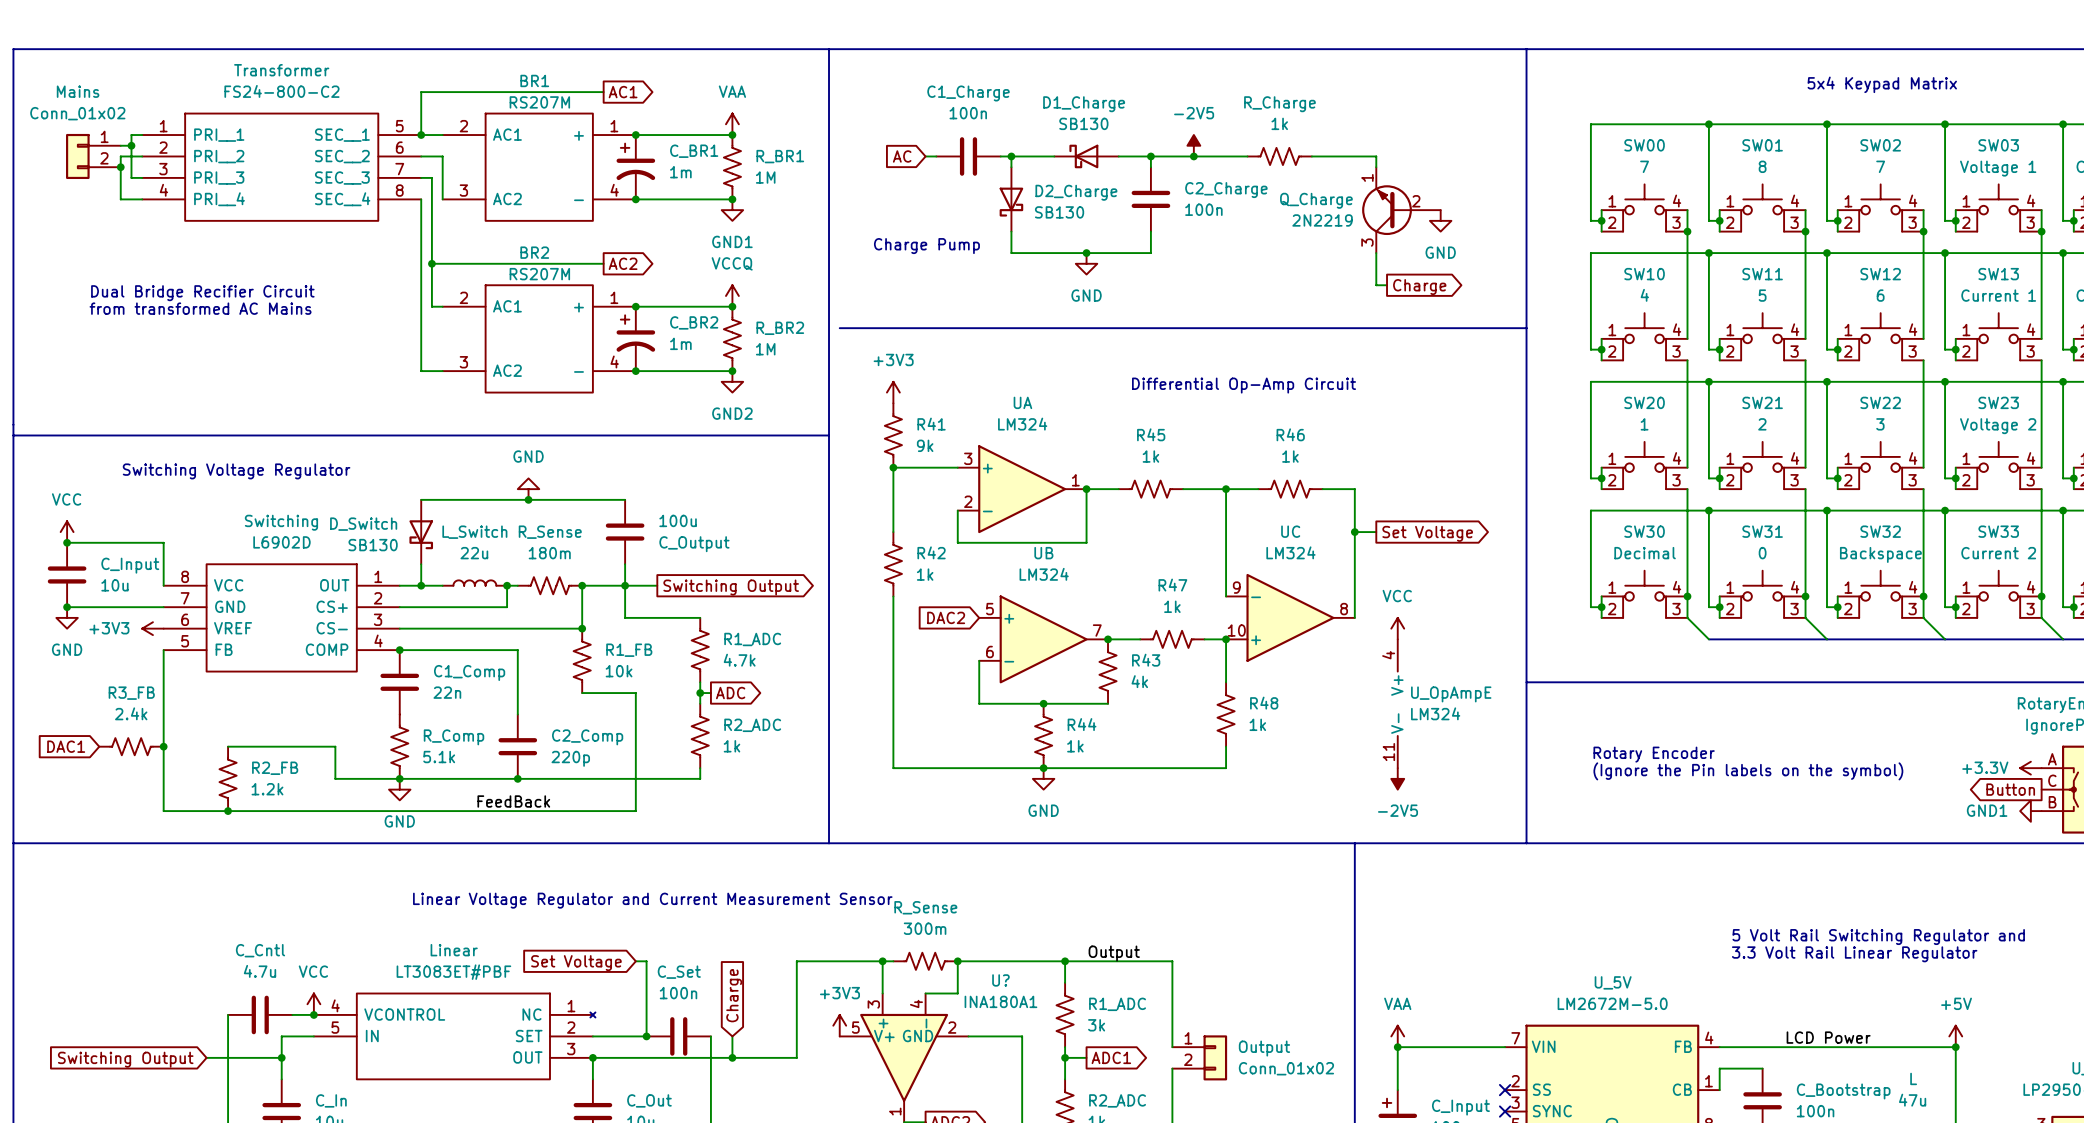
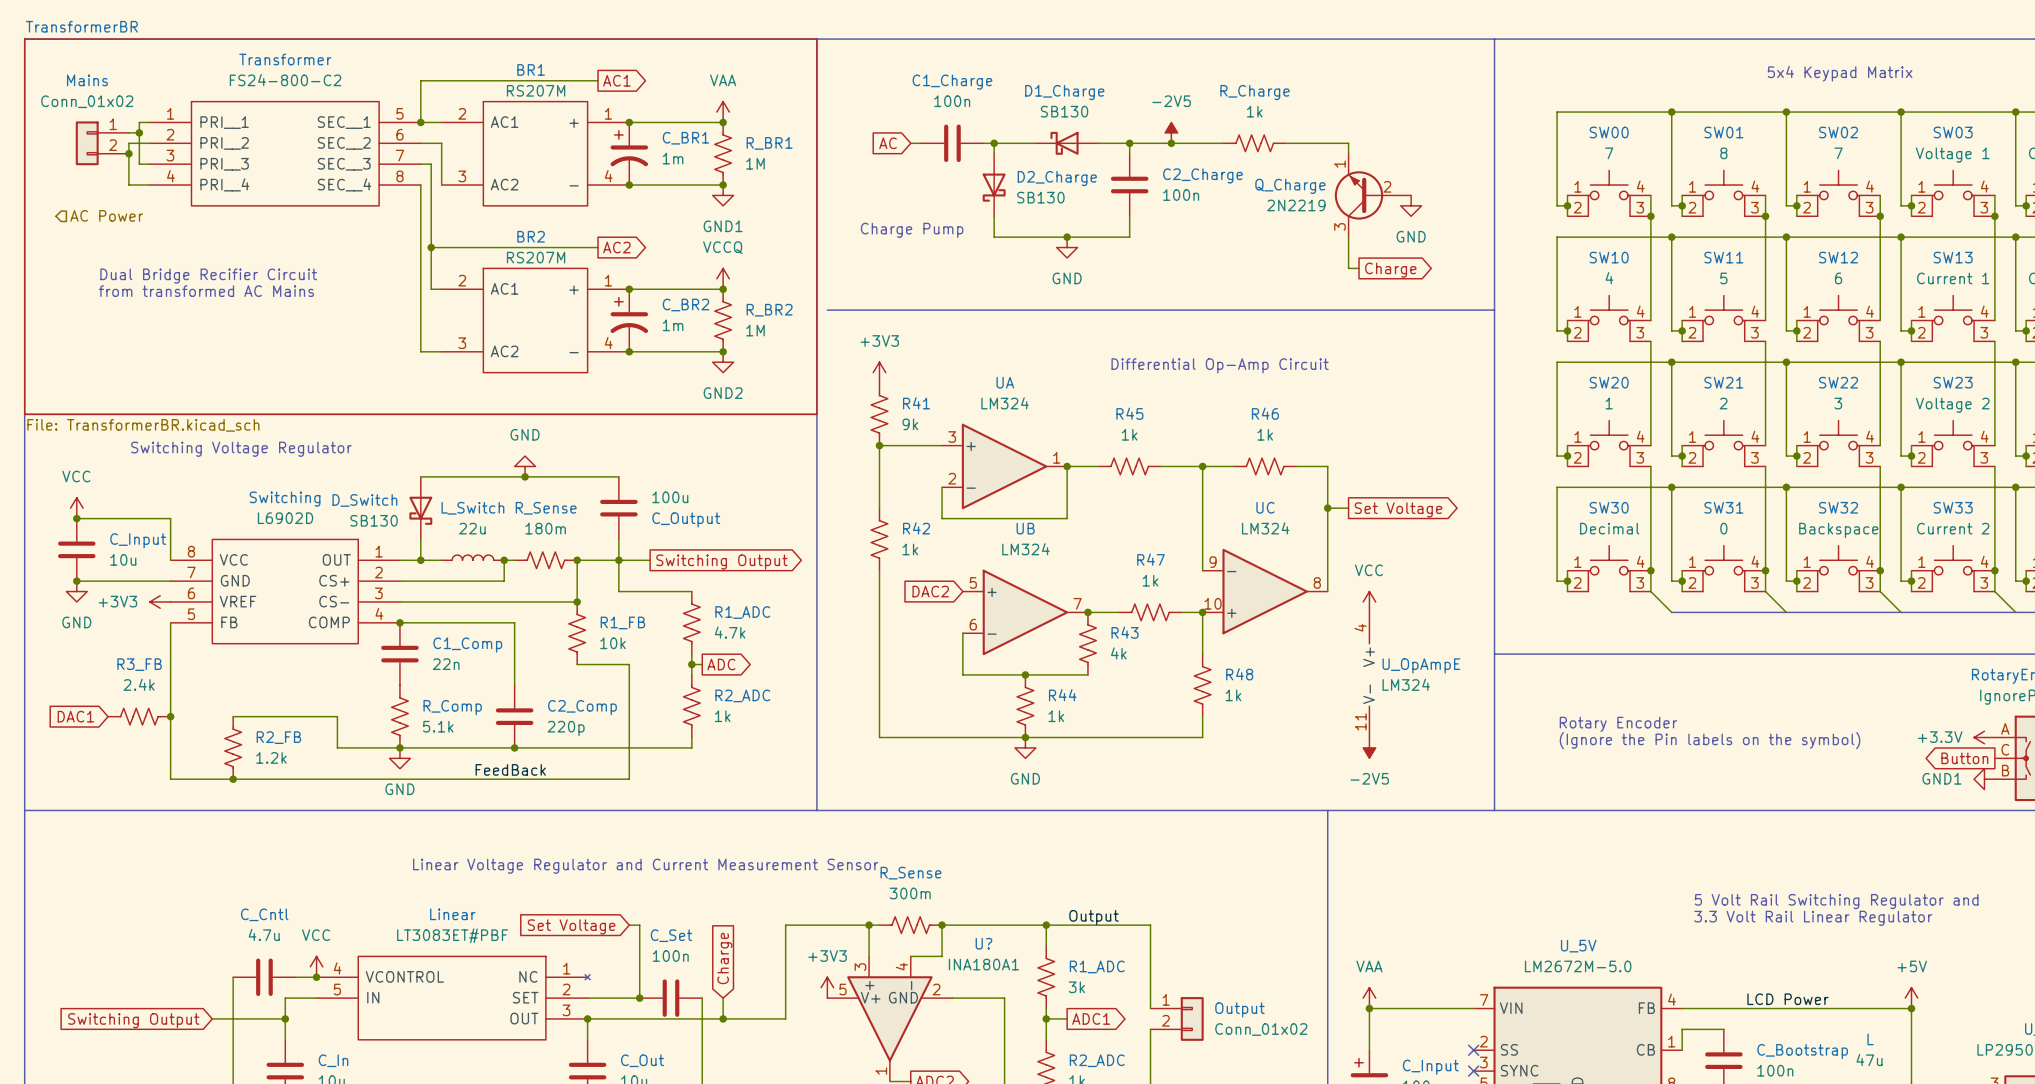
hierarchical label: none -> AC Power (106, 215)
sheet TransformerBR: none -> File: TransformerBR.kicad_sch (420, 226)

